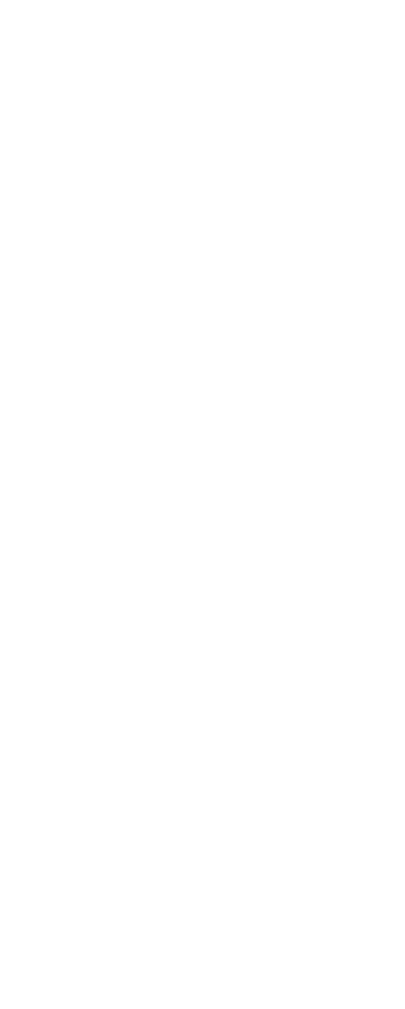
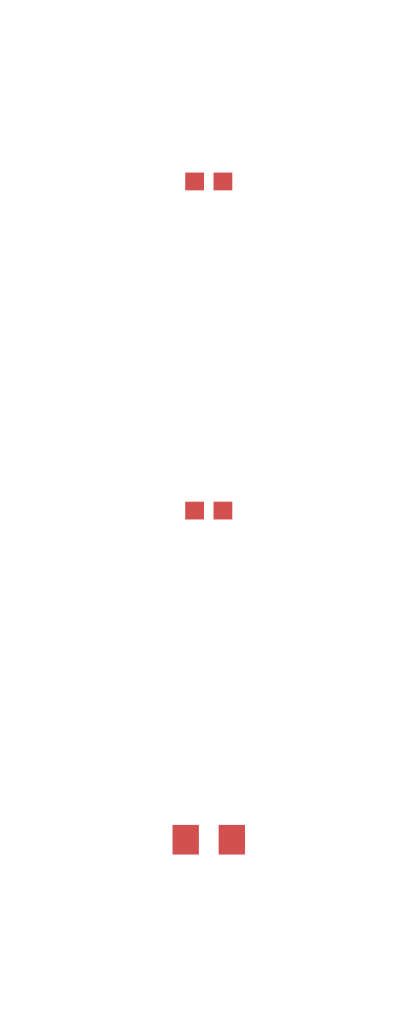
part: none -> (208, 181)
part: none -> (208, 510)
part: none -> (208, 839)

